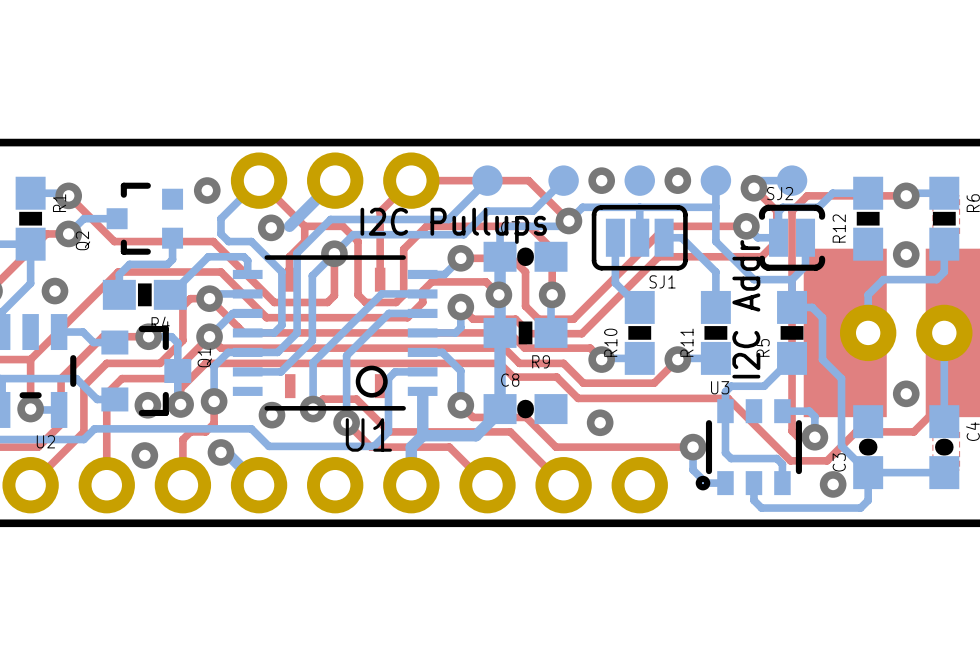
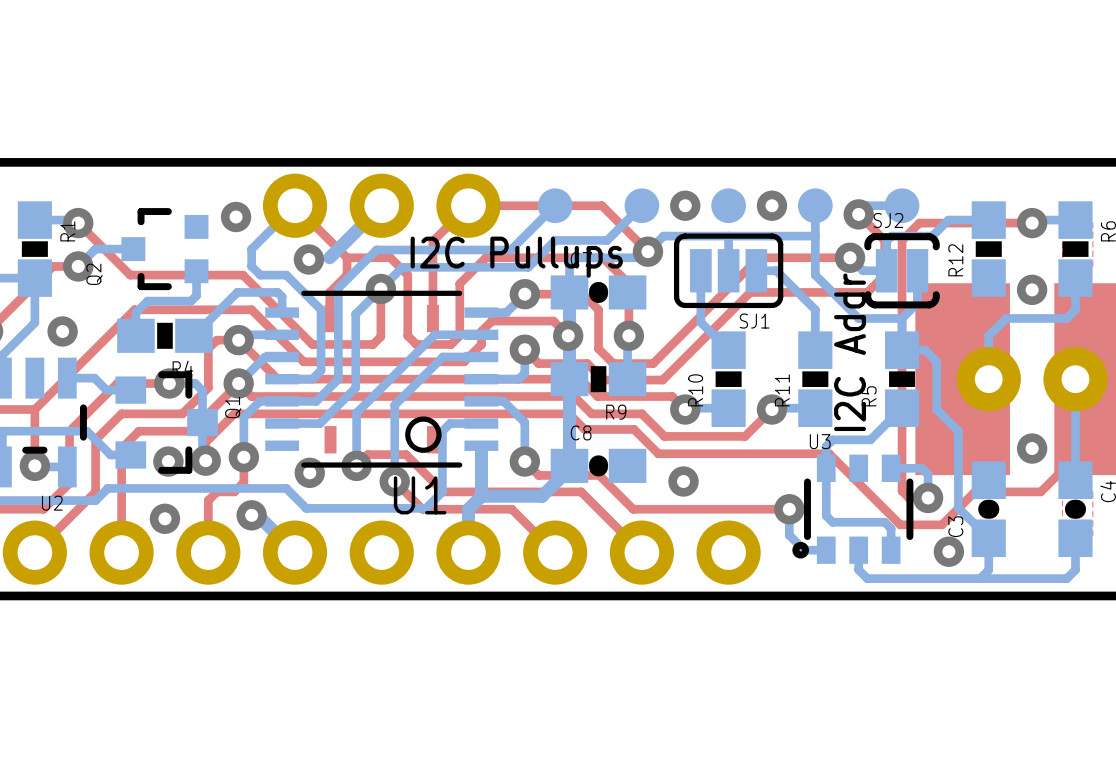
bottom track: (944, 472) (868, 472) -> (1075, 538) (1075, 569) (1066, 578) (980, 578)

